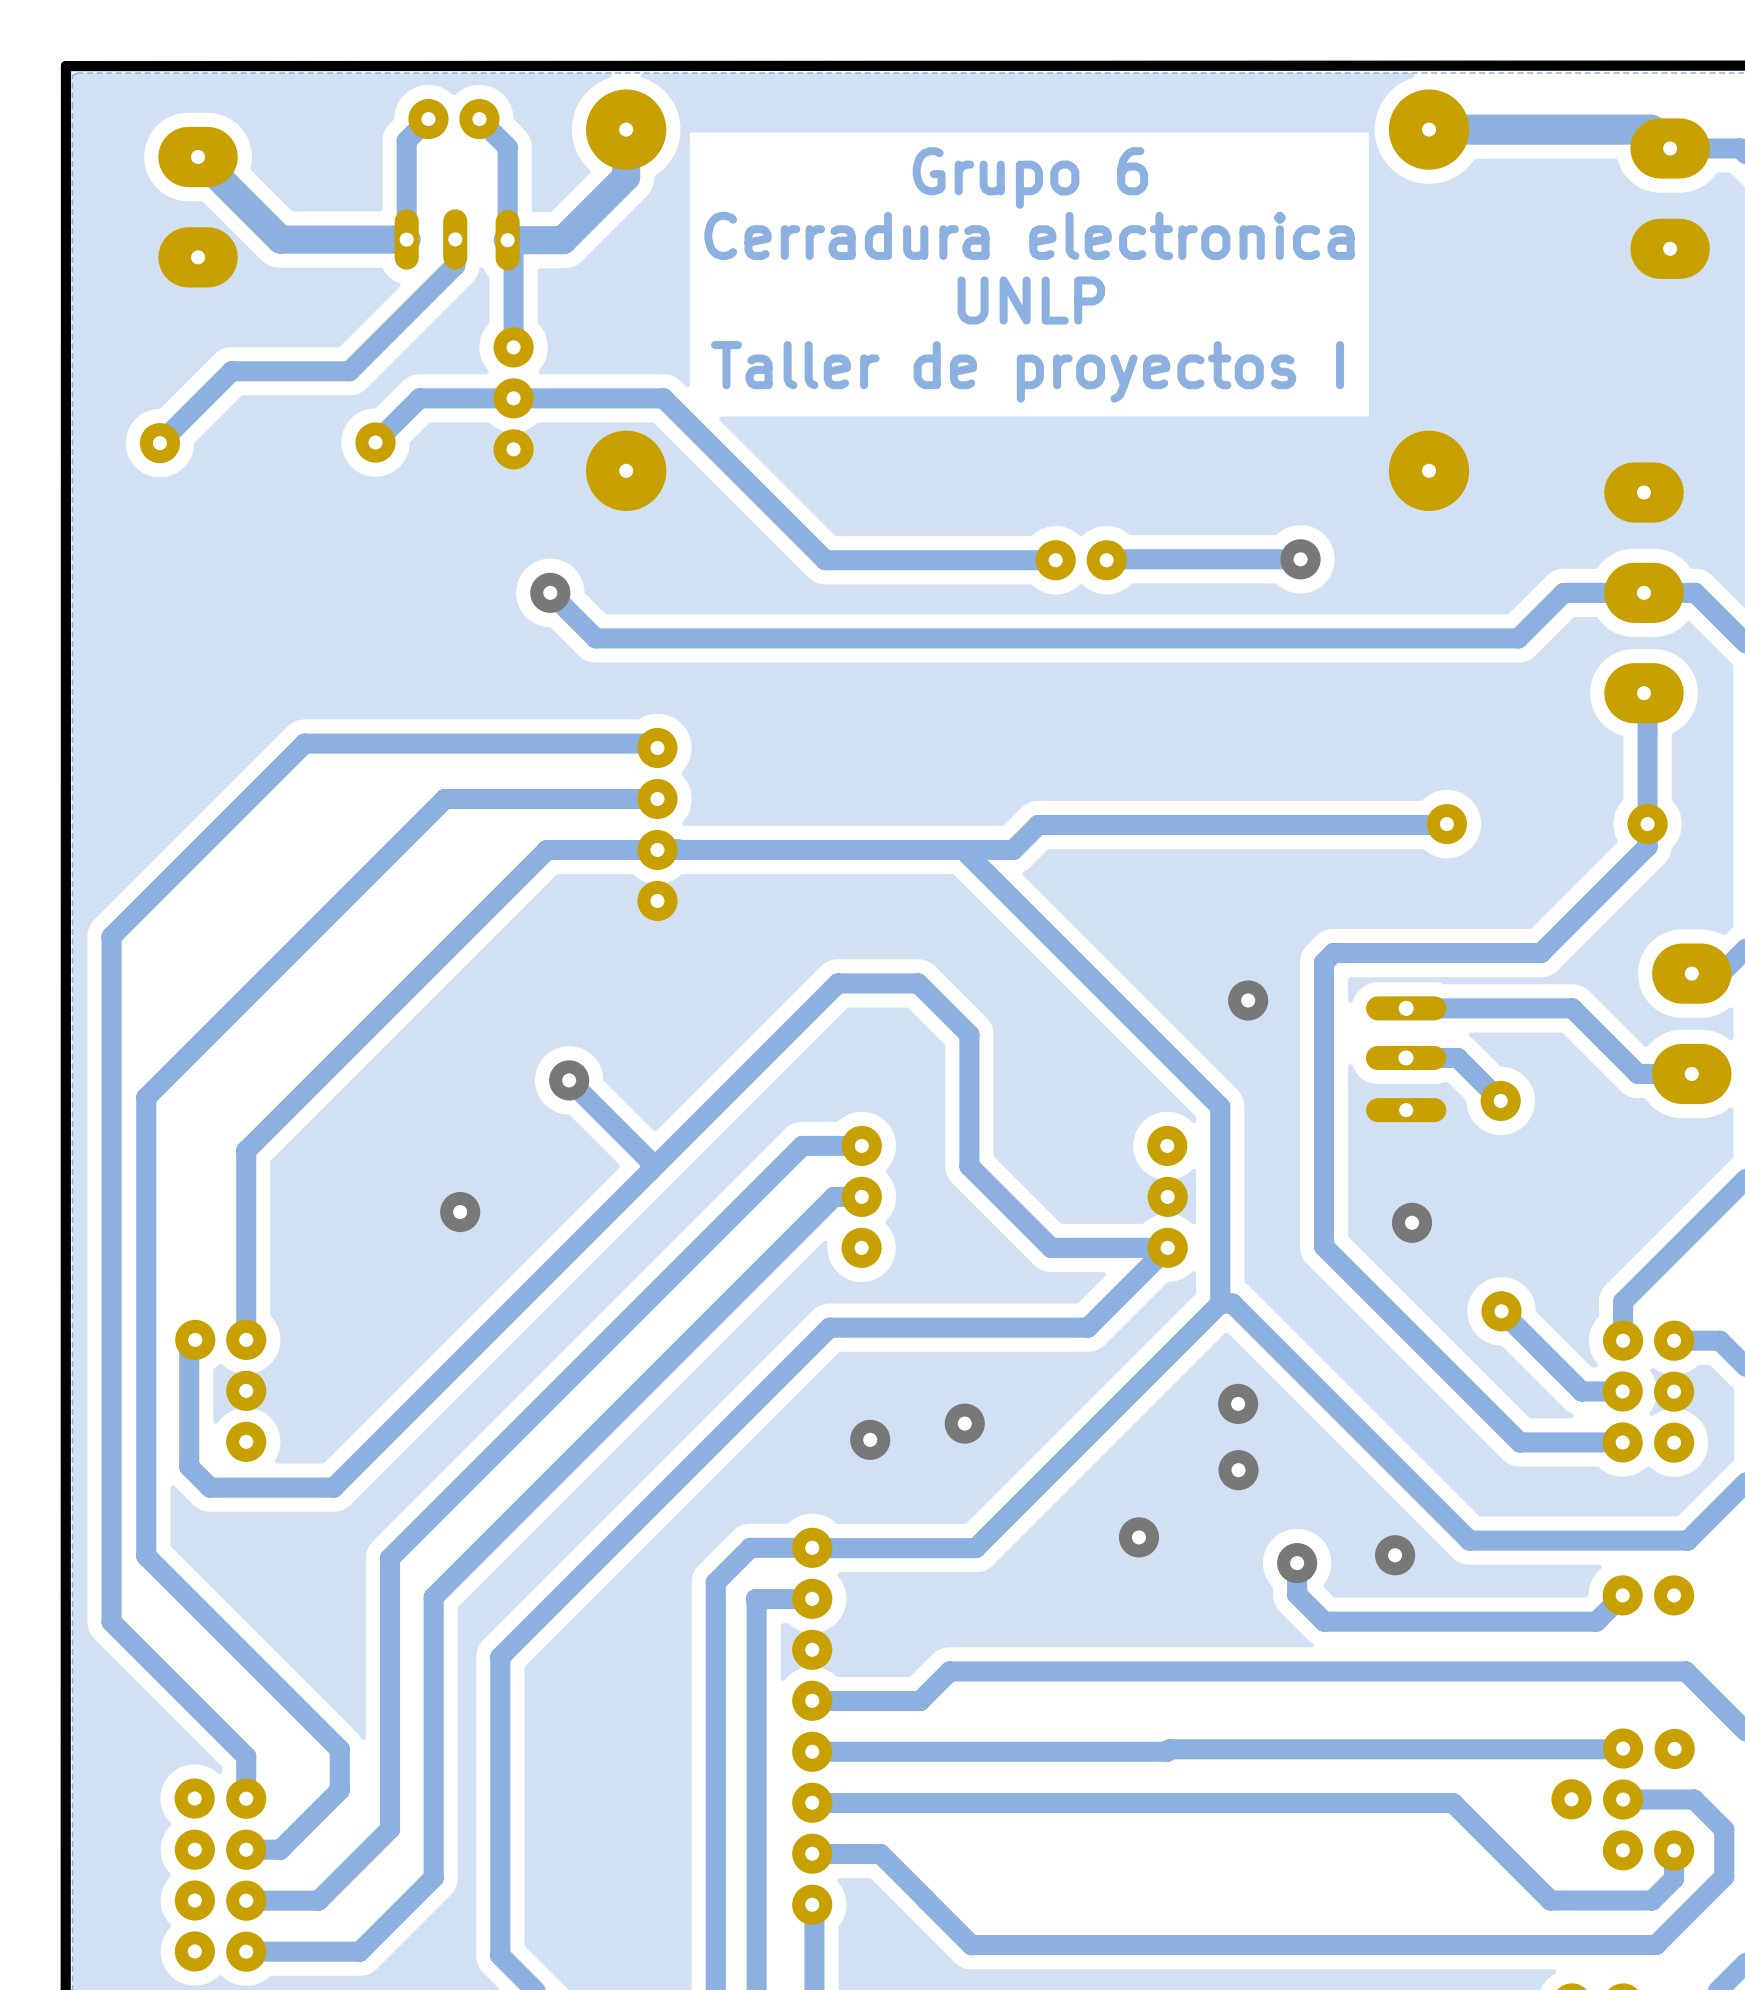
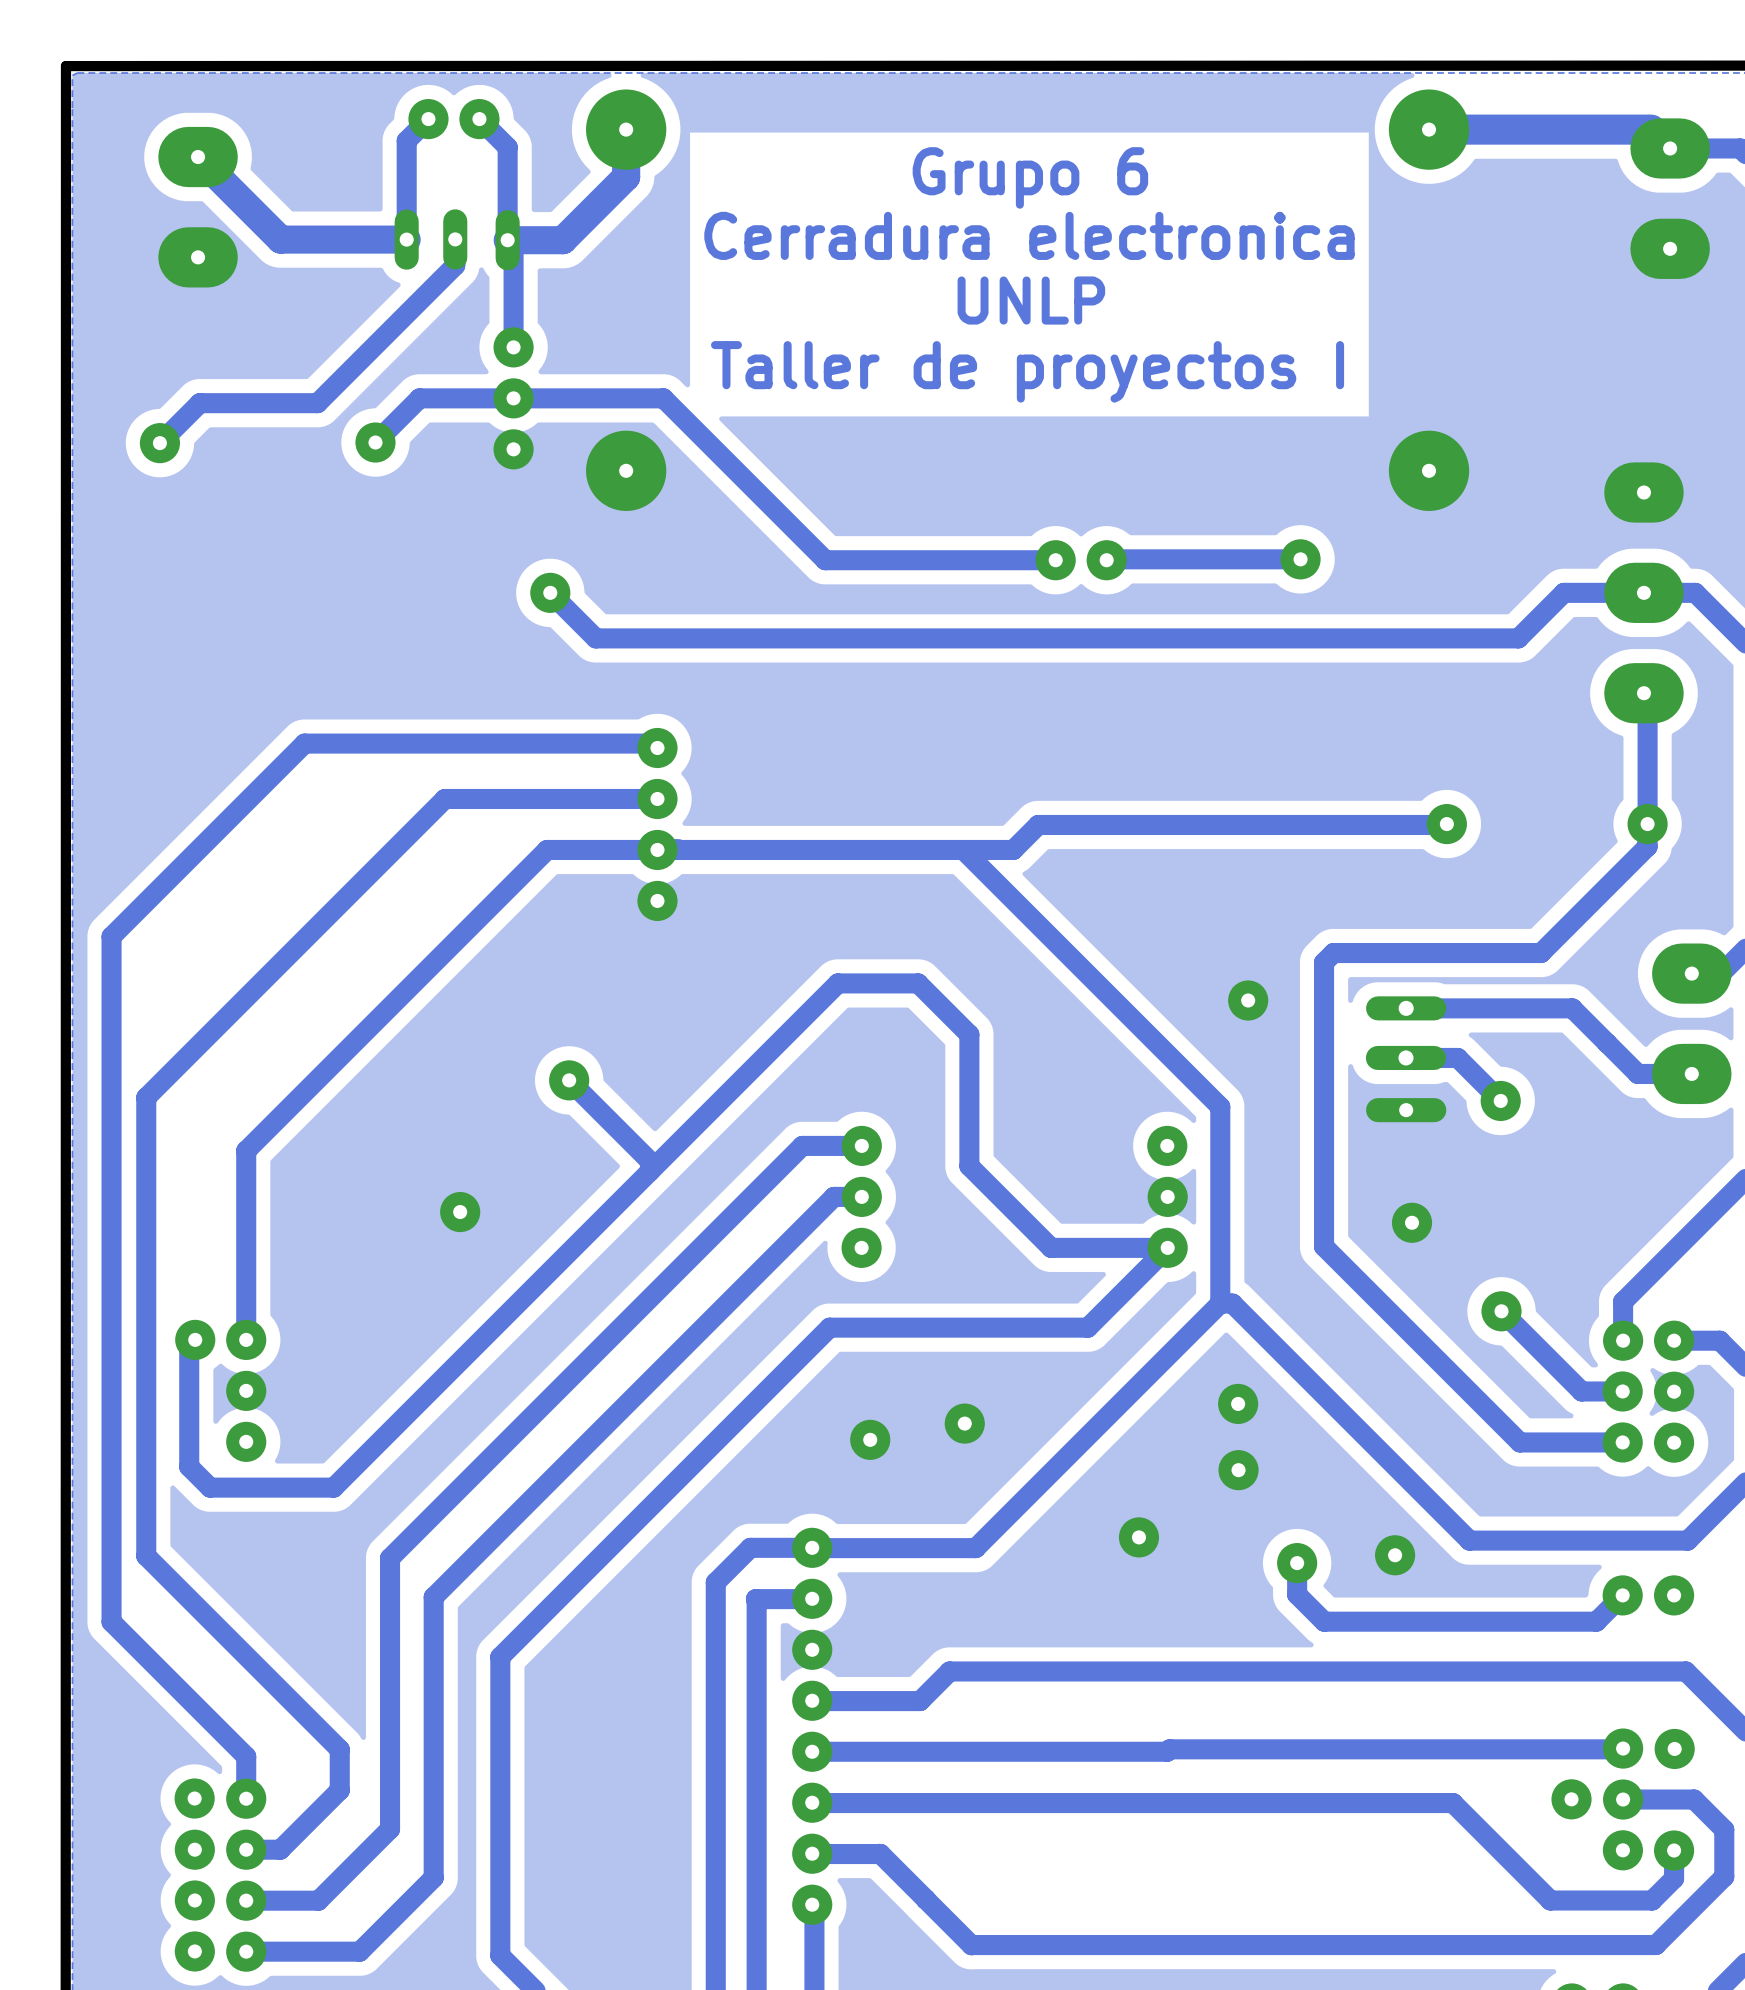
track: (349, 371) (231, 371) (199, 403) -> (349, 371) (317, 403) (199, 403)

